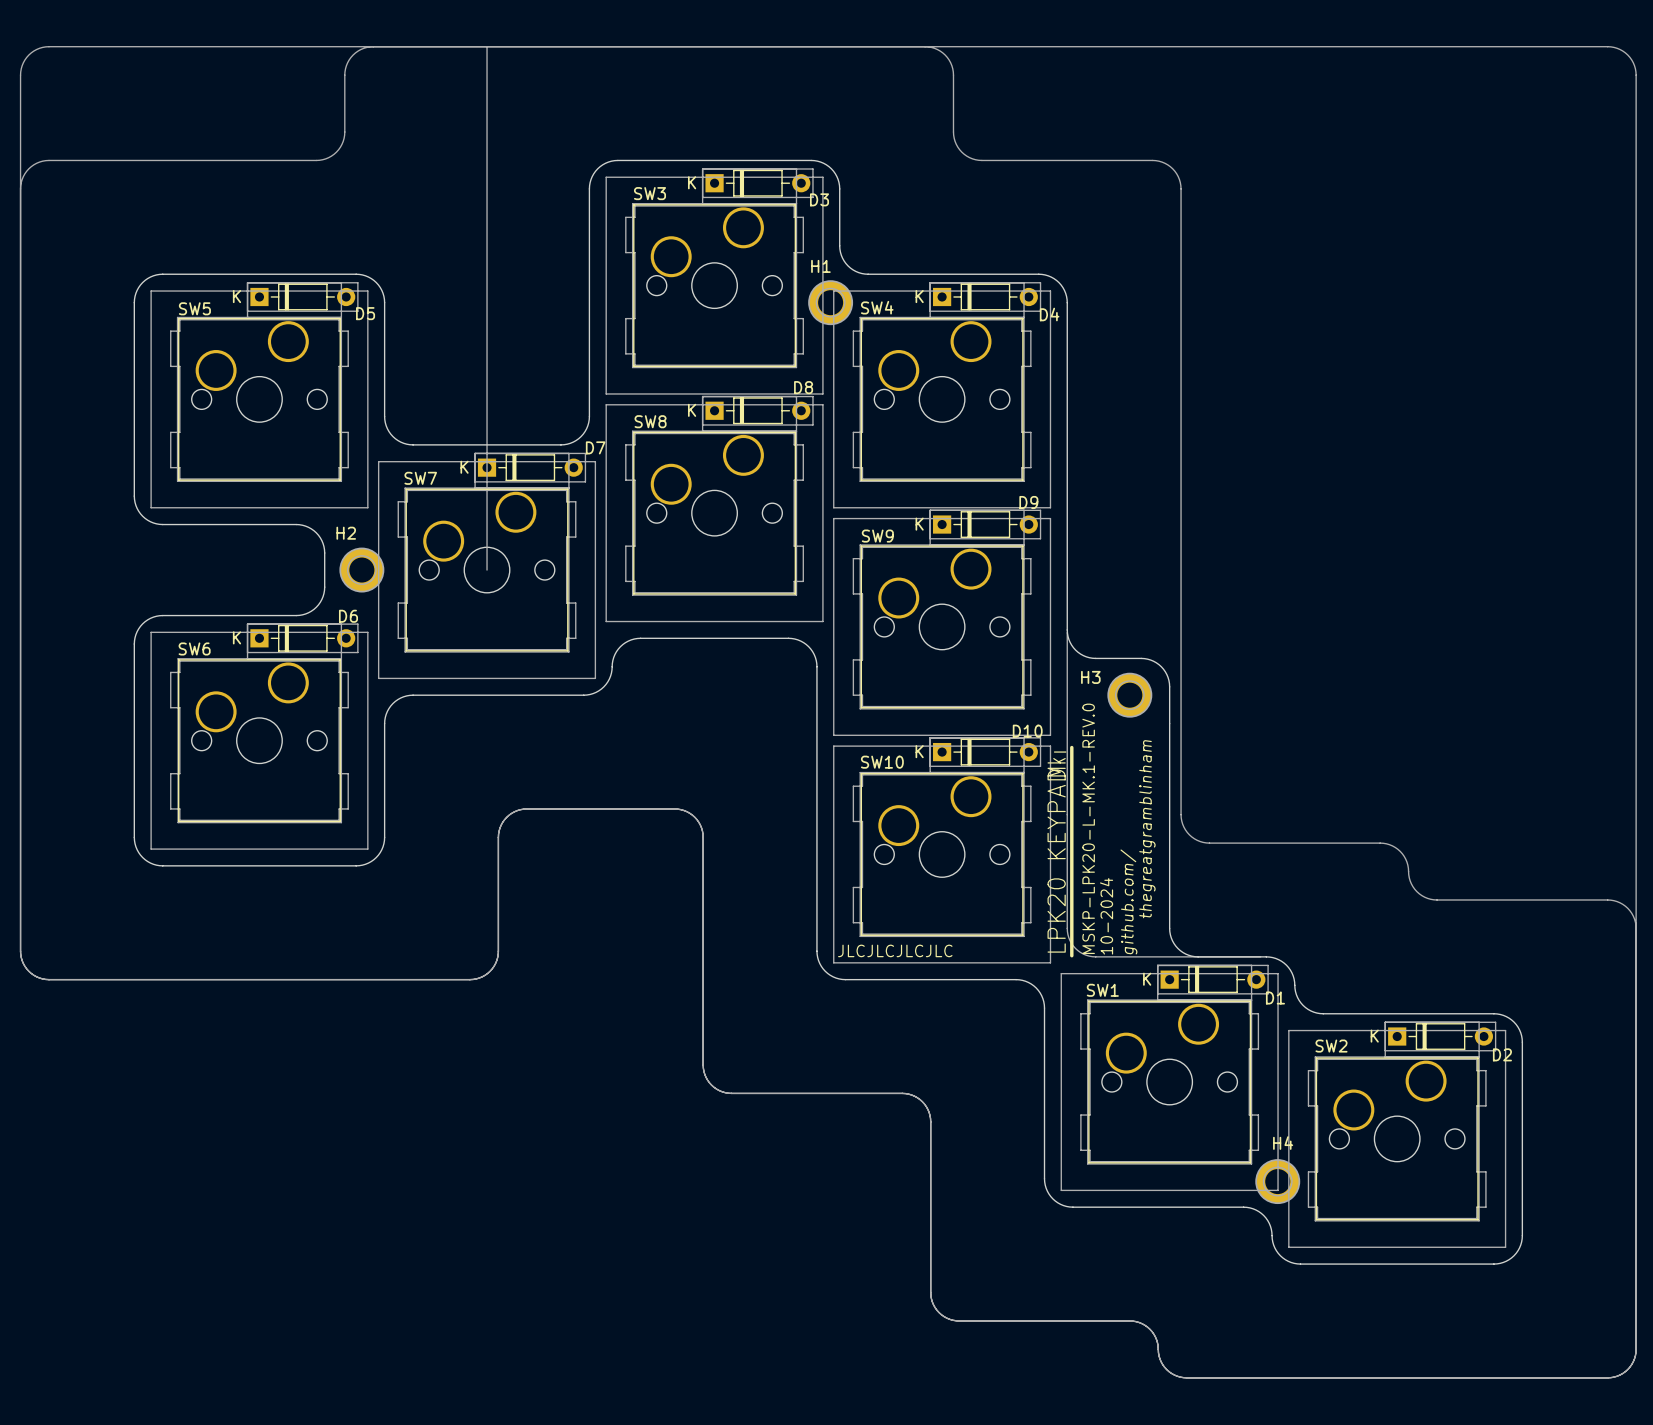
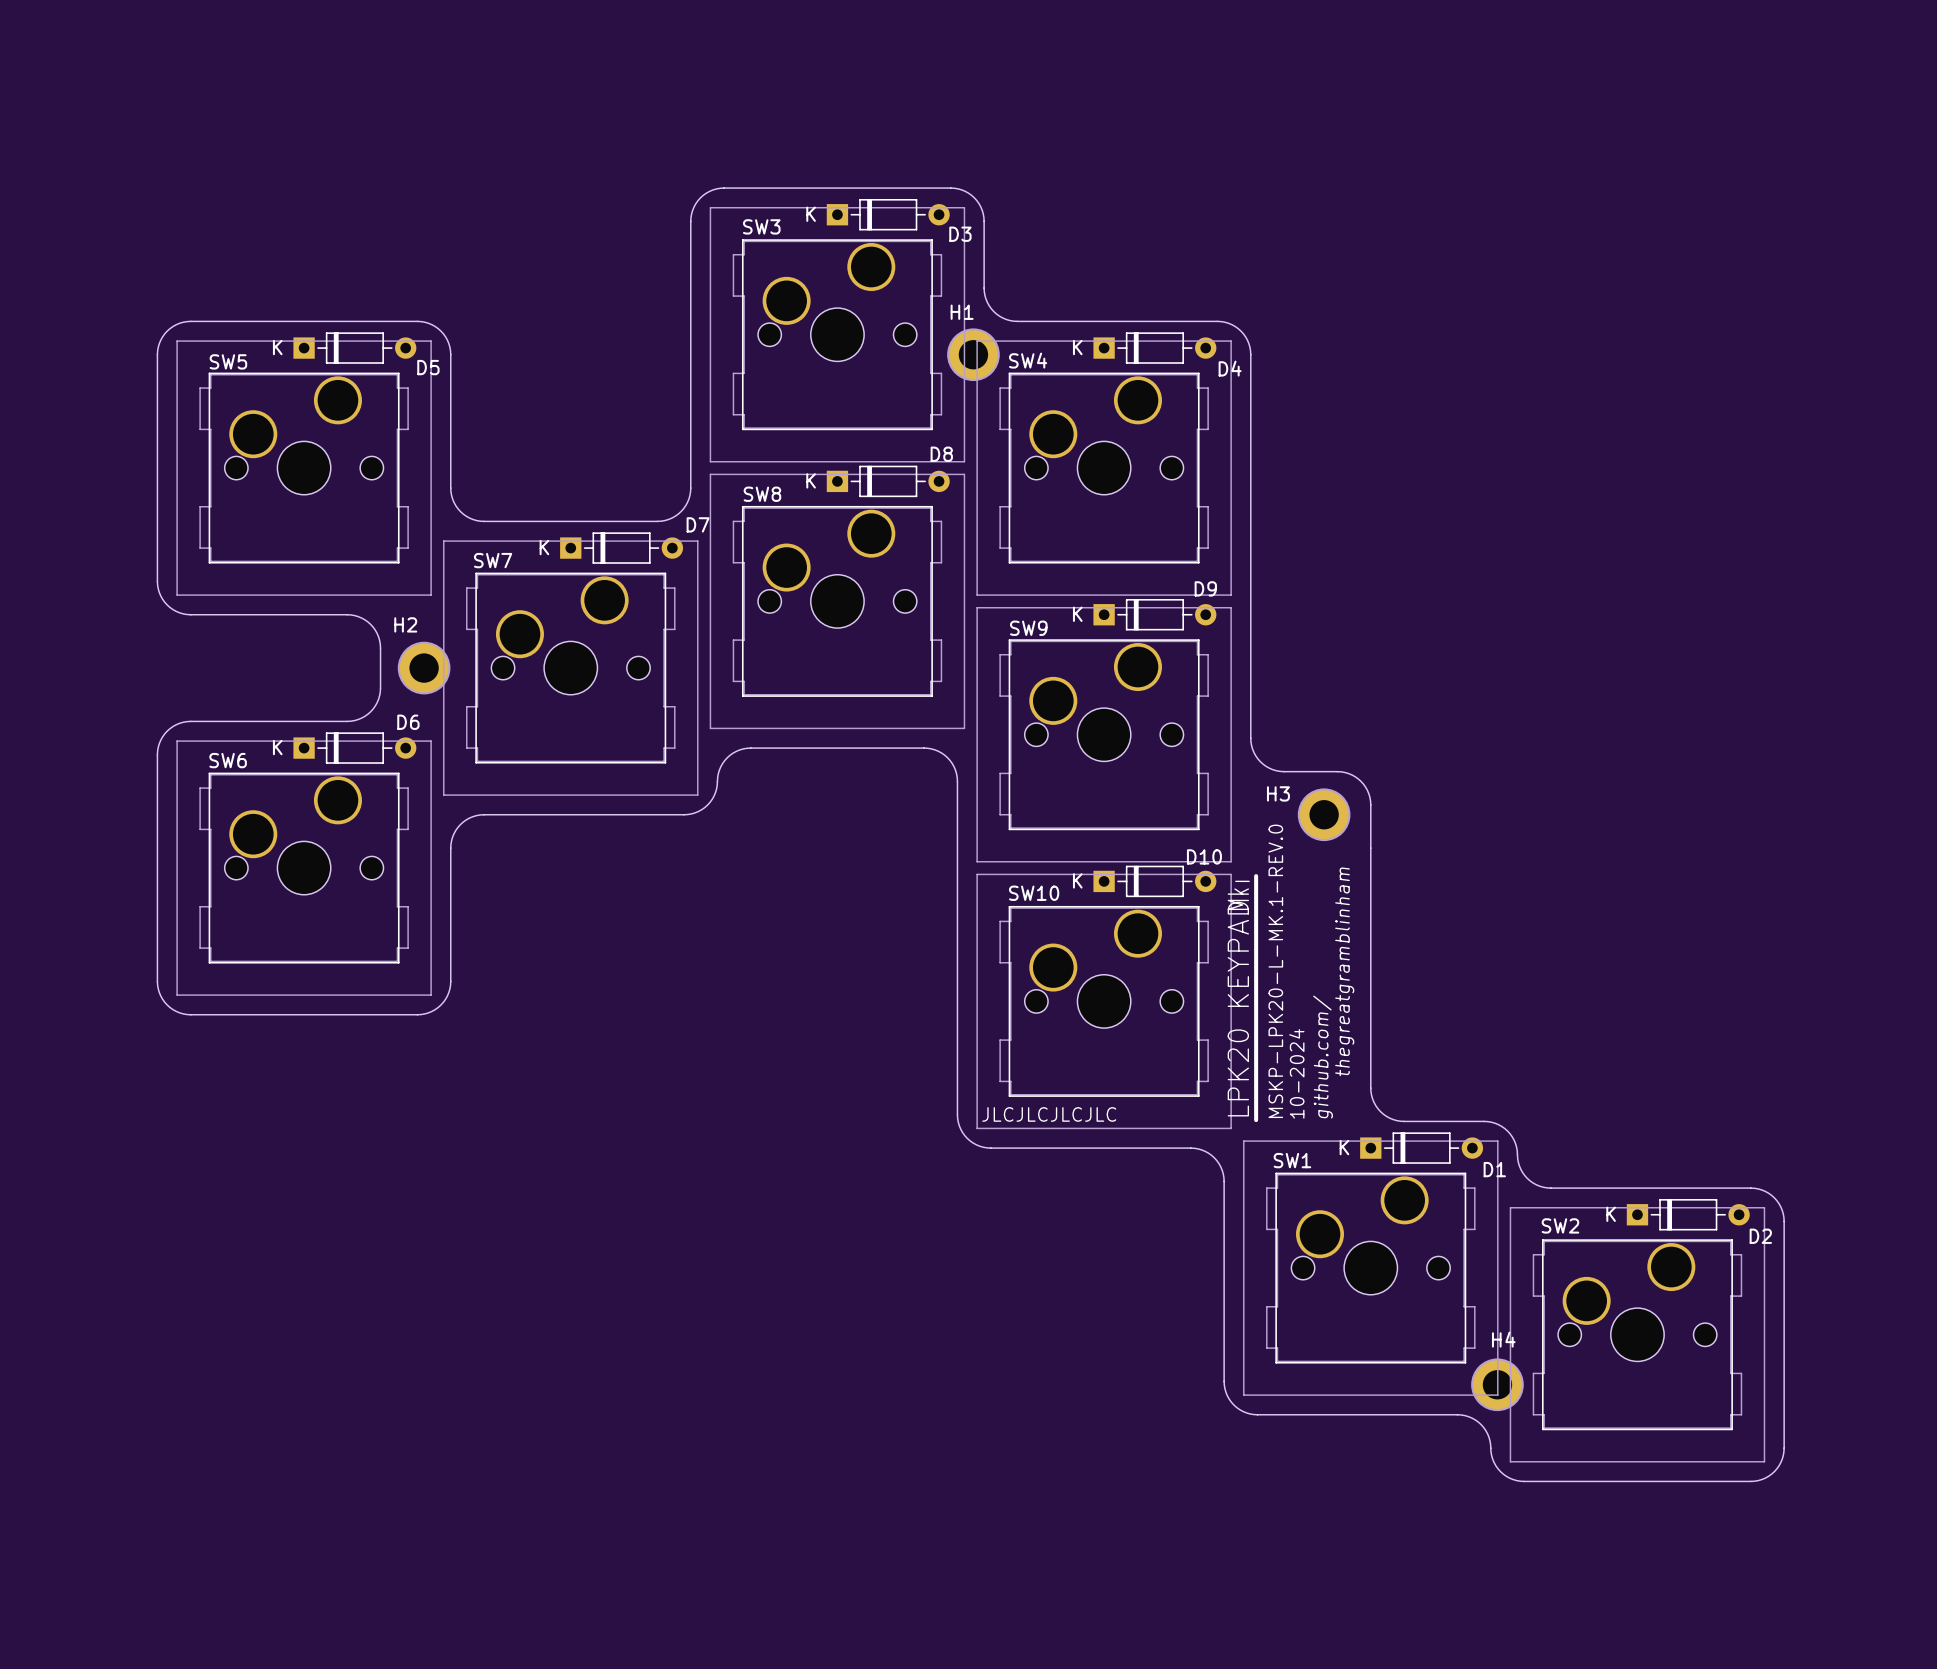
line: (373, 46) (358, 51) (347, 62) (344, 75) (344, 138) (336, 152) (325, 158) (316, 160) (45, 160) (36, 163) (26, 171) (22, 179) (20, 188) -> none
line: (487, 46) (487, 570) -> none
line: (925, 46) (934, 48) (942, 52) (951, 65) (954, 138) (959, 149) (969, 157) (981, 160) (1155, 160) (1170, 166) (1179, 179) (1181, 188) (1181, 814) (1182, 824) (1187, 832) (1197, 840) (1206, 842) (1386, 843) (1395, 847) (1402, 853) (1406, 862) (1412, 886) (1419, 893) (1427, 898) (1437, 899) (1610, 900) (1620, 902) (1627, 908) (1633, 916) (1636, 928) -> none
line: (796, 169) (796, 367) (632, 367) (632, 203) (796, 203) -> none
line: (702, 197) (812, 197) (812, 169) (702, 169) (702, 203) -> none
line: (341, 282) (341, 481) (177, 481) (177, 317) (341, 317) -> none
line: (1024, 282) (1024, 481) (860, 481) (860, 317) (1024, 317) -> none
drawing: [815, 287, 846, 318] -> none
line: (247, 311) (357, 311) (357, 282) (247, 282) (247, 317) -> none
line: (930, 311) (1040, 311) (1040, 282) (930, 282) (930, 317) -> none
line: (796, 396) (796, 595) (632, 595) (632, 431) (796, 431) -> none
line: (702, 424) (812, 424) (812, 396) (702, 396) (702, 431) -> none
line: (568, 453) (568, 651) (405, 651) (405, 488) (568, 488) -> none
line: (475, 481) (585, 481) (585, 453) (475, 453) (475, 488) -> none
line: (1024, 510) (1024, 708) (860, 708) (860, 545) (1024, 545) -> none
line: (930, 538) (1040, 538) (1040, 510) (930, 510) (930, 545) -> none
drawing: [347, 555, 377, 585] -> none
line: (341, 624) (341, 822) (178, 822) (178, 658) (341, 658) -> none
line: (1067, 632) (1067, 928) (1071, 943) (1080, 952) (1092, 956) (1260, 956) -> none
line: (247, 652) (357, 652) (357, 624) (247, 624) (247, 658) -> none
drawing: [1115, 680, 1145, 710] -> none
line: (1024, 737) (1024, 936) (860, 936) (860, 772) (1024, 772) -> none
line: (930, 766) (1040, 766) (1040, 737) (930, 737) (930, 772) -> none
line: (526, 808) (674, 808) -> none
line: (526, 808) (514, 811) (506, 817) (501, 825) (498, 837) -> none
line: (526, 808) (514, 811) (506, 817) (501, 825) (498, 837) -> none
line: (674, 808) (684, 810) (694, 817) (700, 825) (703, 837) -> none
line: (674, 808) (684, 810) (694, 817) (700, 825) (703, 837) -> none
line: (498, 837) (498, 951) -> none
line: (703, 837) (703, 1064) -> none
line: (20, 951) (20, 75) (23, 62) (33, 51) (48, 46) (1614, 47) (1622, 51) (1629, 57) (1634, 65) (1636, 75) (1636, 1349) -> none
line: (20, 951) (22, 960) (28, 971) (36, 976) (48, 979) -> none
line: (20, 951) (22, 960) (28, 971) (36, 976) (48, 979) -> none
line: (498, 951) (496, 960) (490, 971) (482, 976) (469, 979) -> none
line: (498, 951) (496, 960) (490, 971) (482, 976) (469, 979) -> none
line: (1251, 965) (1251, 1163) (1087, 1163) (1087, 1000) (1251, 1000) -> none
line: (48, 979) (469, 979) -> none
line: (1157, 993) (1268, 993) (1268, 965) (1157, 965) (1157, 1000) -> none
line: (1479, 1022) (1479, 1220) (1315, 1220) (1315, 1056) (1479, 1056) -> none
line: (1385, 1050) (1495, 1050) (1495, 1022) (1385, 1022) (1385, 1056) -> none
line: (703, 1064) (706, 1077) (711, 1085) (722, 1091) (731, 1093) -> none
line: (703, 1064) (706, 1077) (711, 1085) (722, 1091) (731, 1093) -> none
line: (731, 1093) (902, 1093) -> none
line: (902, 1093) (914, 1096) (922, 1101) (927, 1109) (930, 1121) -> none
line: (902, 1093) (914, 1096) (922, 1101) (927, 1109) (930, 1121) -> none
line: (930, 1121) (930, 1292) -> none
drawing: [1262, 1166, 1293, 1197] -> none
line: (930, 1292) (932, 1301) (939, 1312) (949, 1319) (959, 1320) -> none
line: (930, 1292) (932, 1301) (939, 1312) (949, 1319) (959, 1320) -> none
line: (959, 1320) (1129, 1320) -> none
line: (1129, 1320) (1139, 1322) (1149, 1329) (1155, 1337) (1158, 1349) -> none
line: (1129, 1320) (1139, 1322) (1149, 1329) (1155, 1337) (1158, 1349) -> none
line: (1158, 1349) (1161, 1361) (1166, 1369) (1174, 1375) (1186, 1377) -> none
line: (1158, 1349) (1161, 1361) (1166, 1369) (1174, 1375) (1186, 1377) -> none
line: (1636, 1349) (1634, 1358) (1627, 1369) (1617, 1376) (1607, 1377) -> none
line: (1636, 1349) (1634, 1358) (1627, 1369) (1617, 1376) (1607, 1377) -> none
line: (1186, 1377) (1607, 1377) -> none

